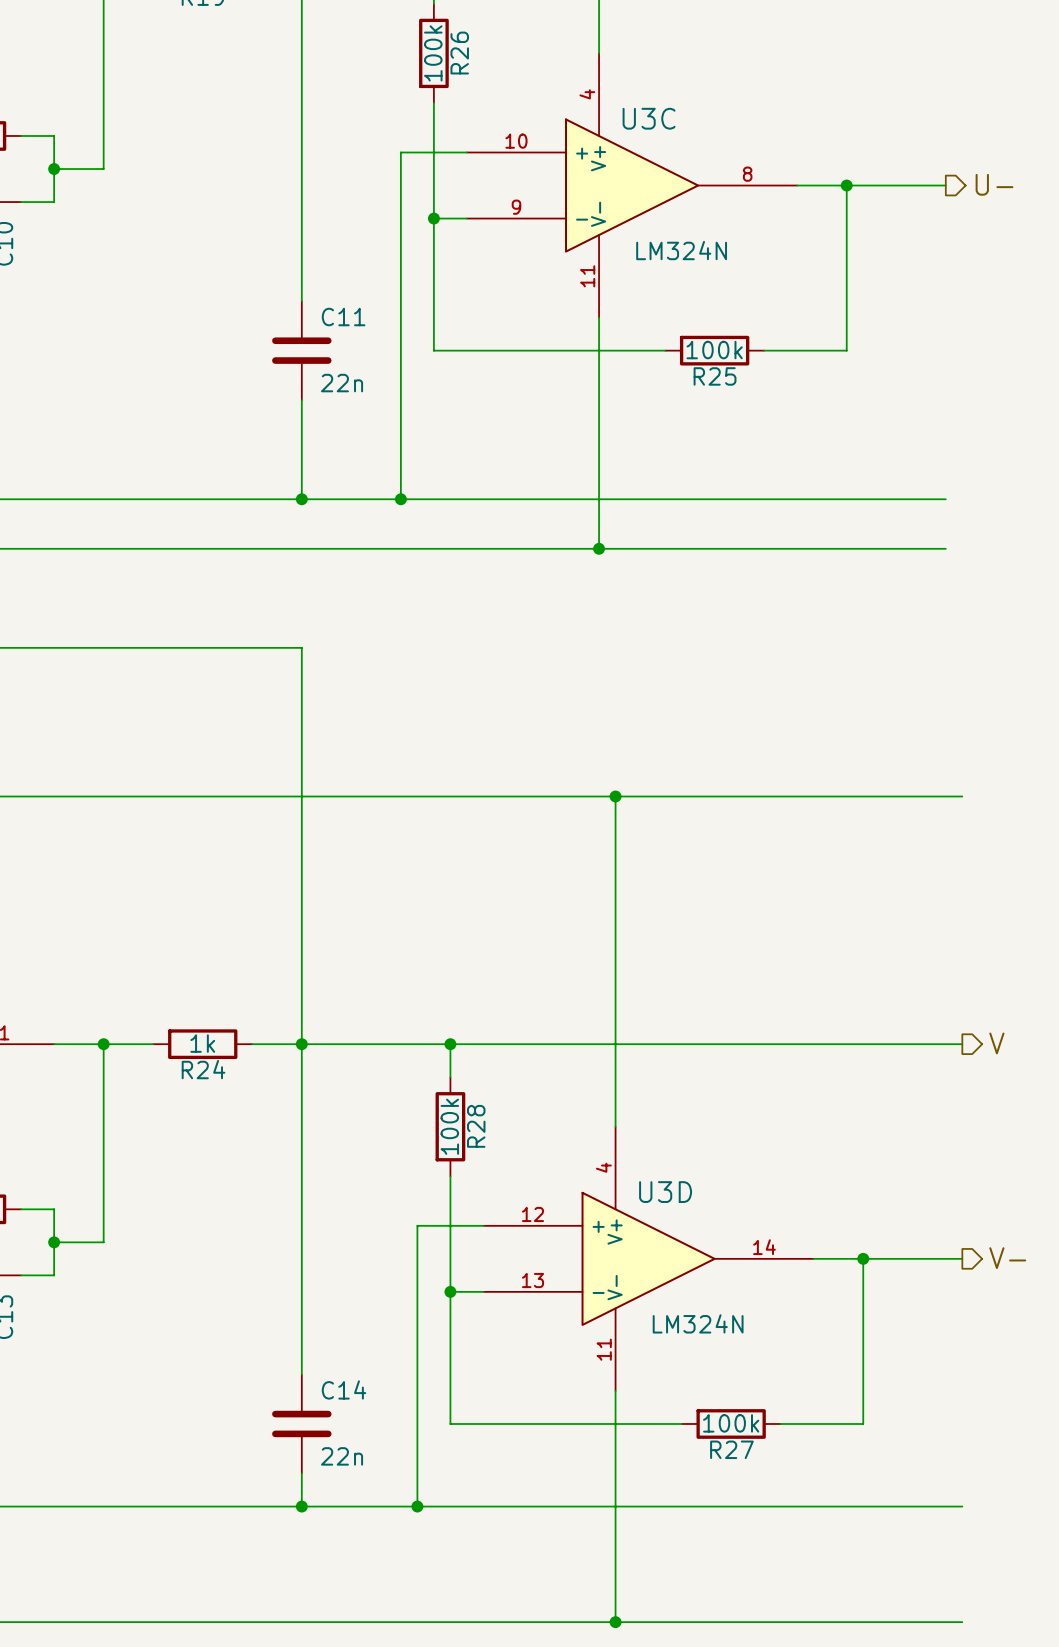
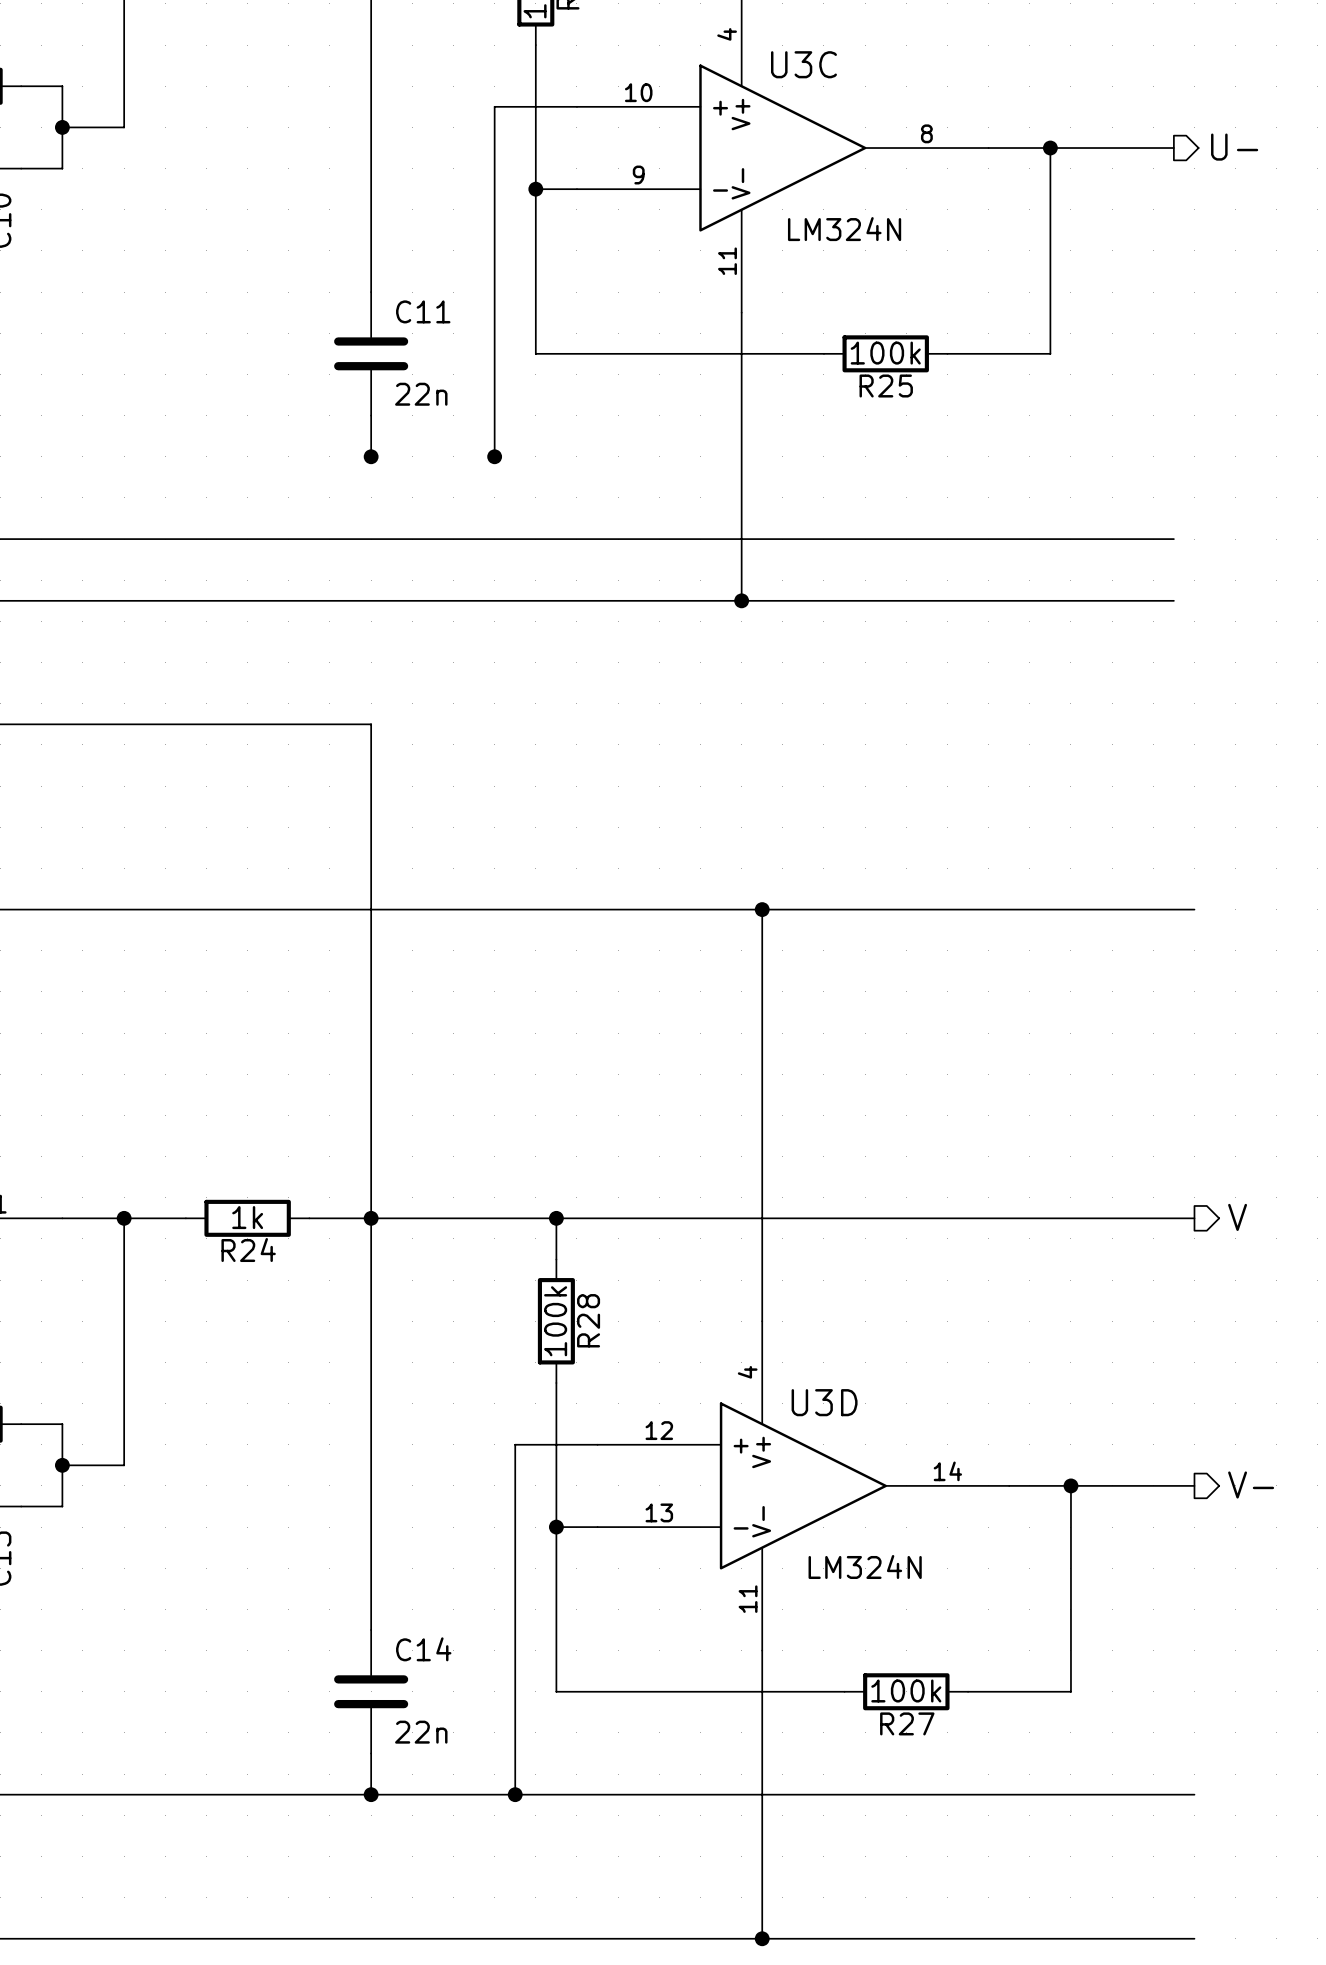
wire: (301, 433) (301, 499) -> none
junction: none -> (371, 456)
wire: (400, 433) (400, 499) -> none
junction: none -> (494, 456)
junction: (301, 499) -> none
junction: (400, 499) -> none

